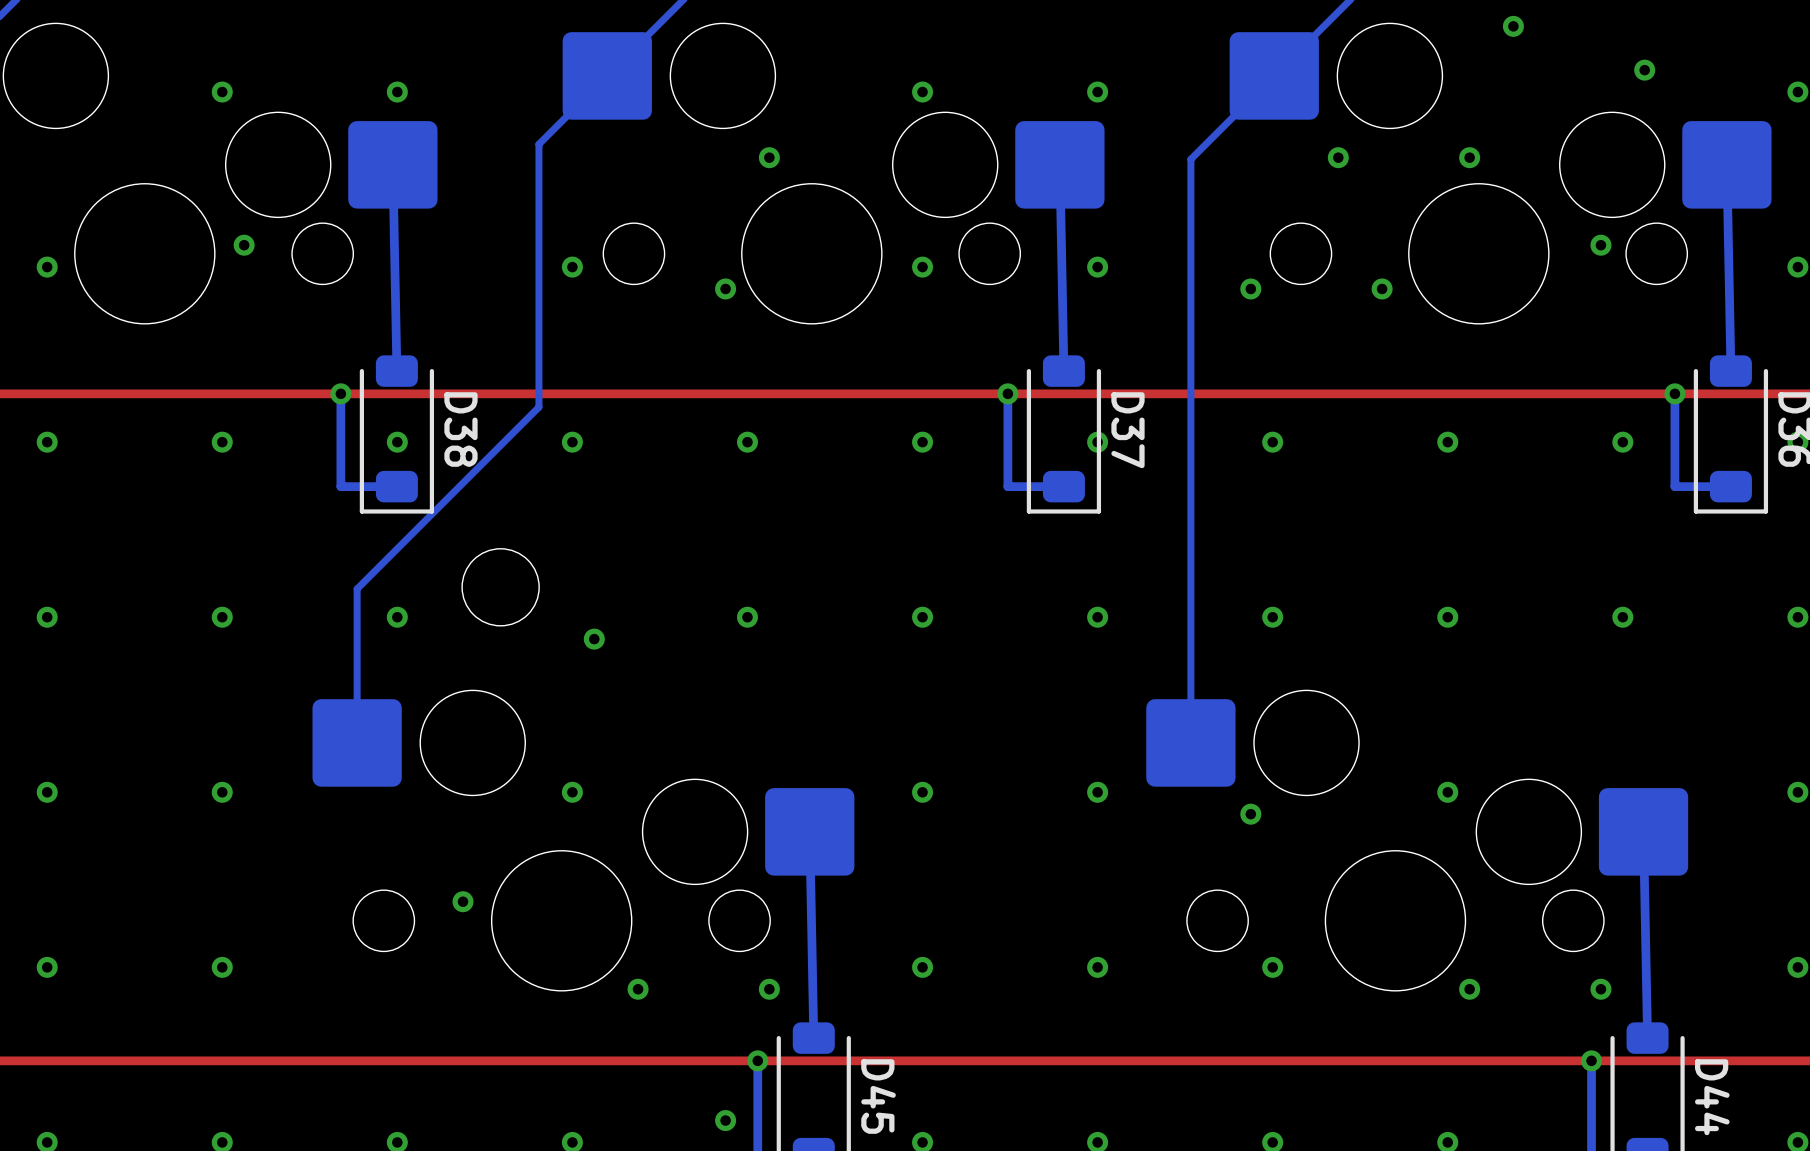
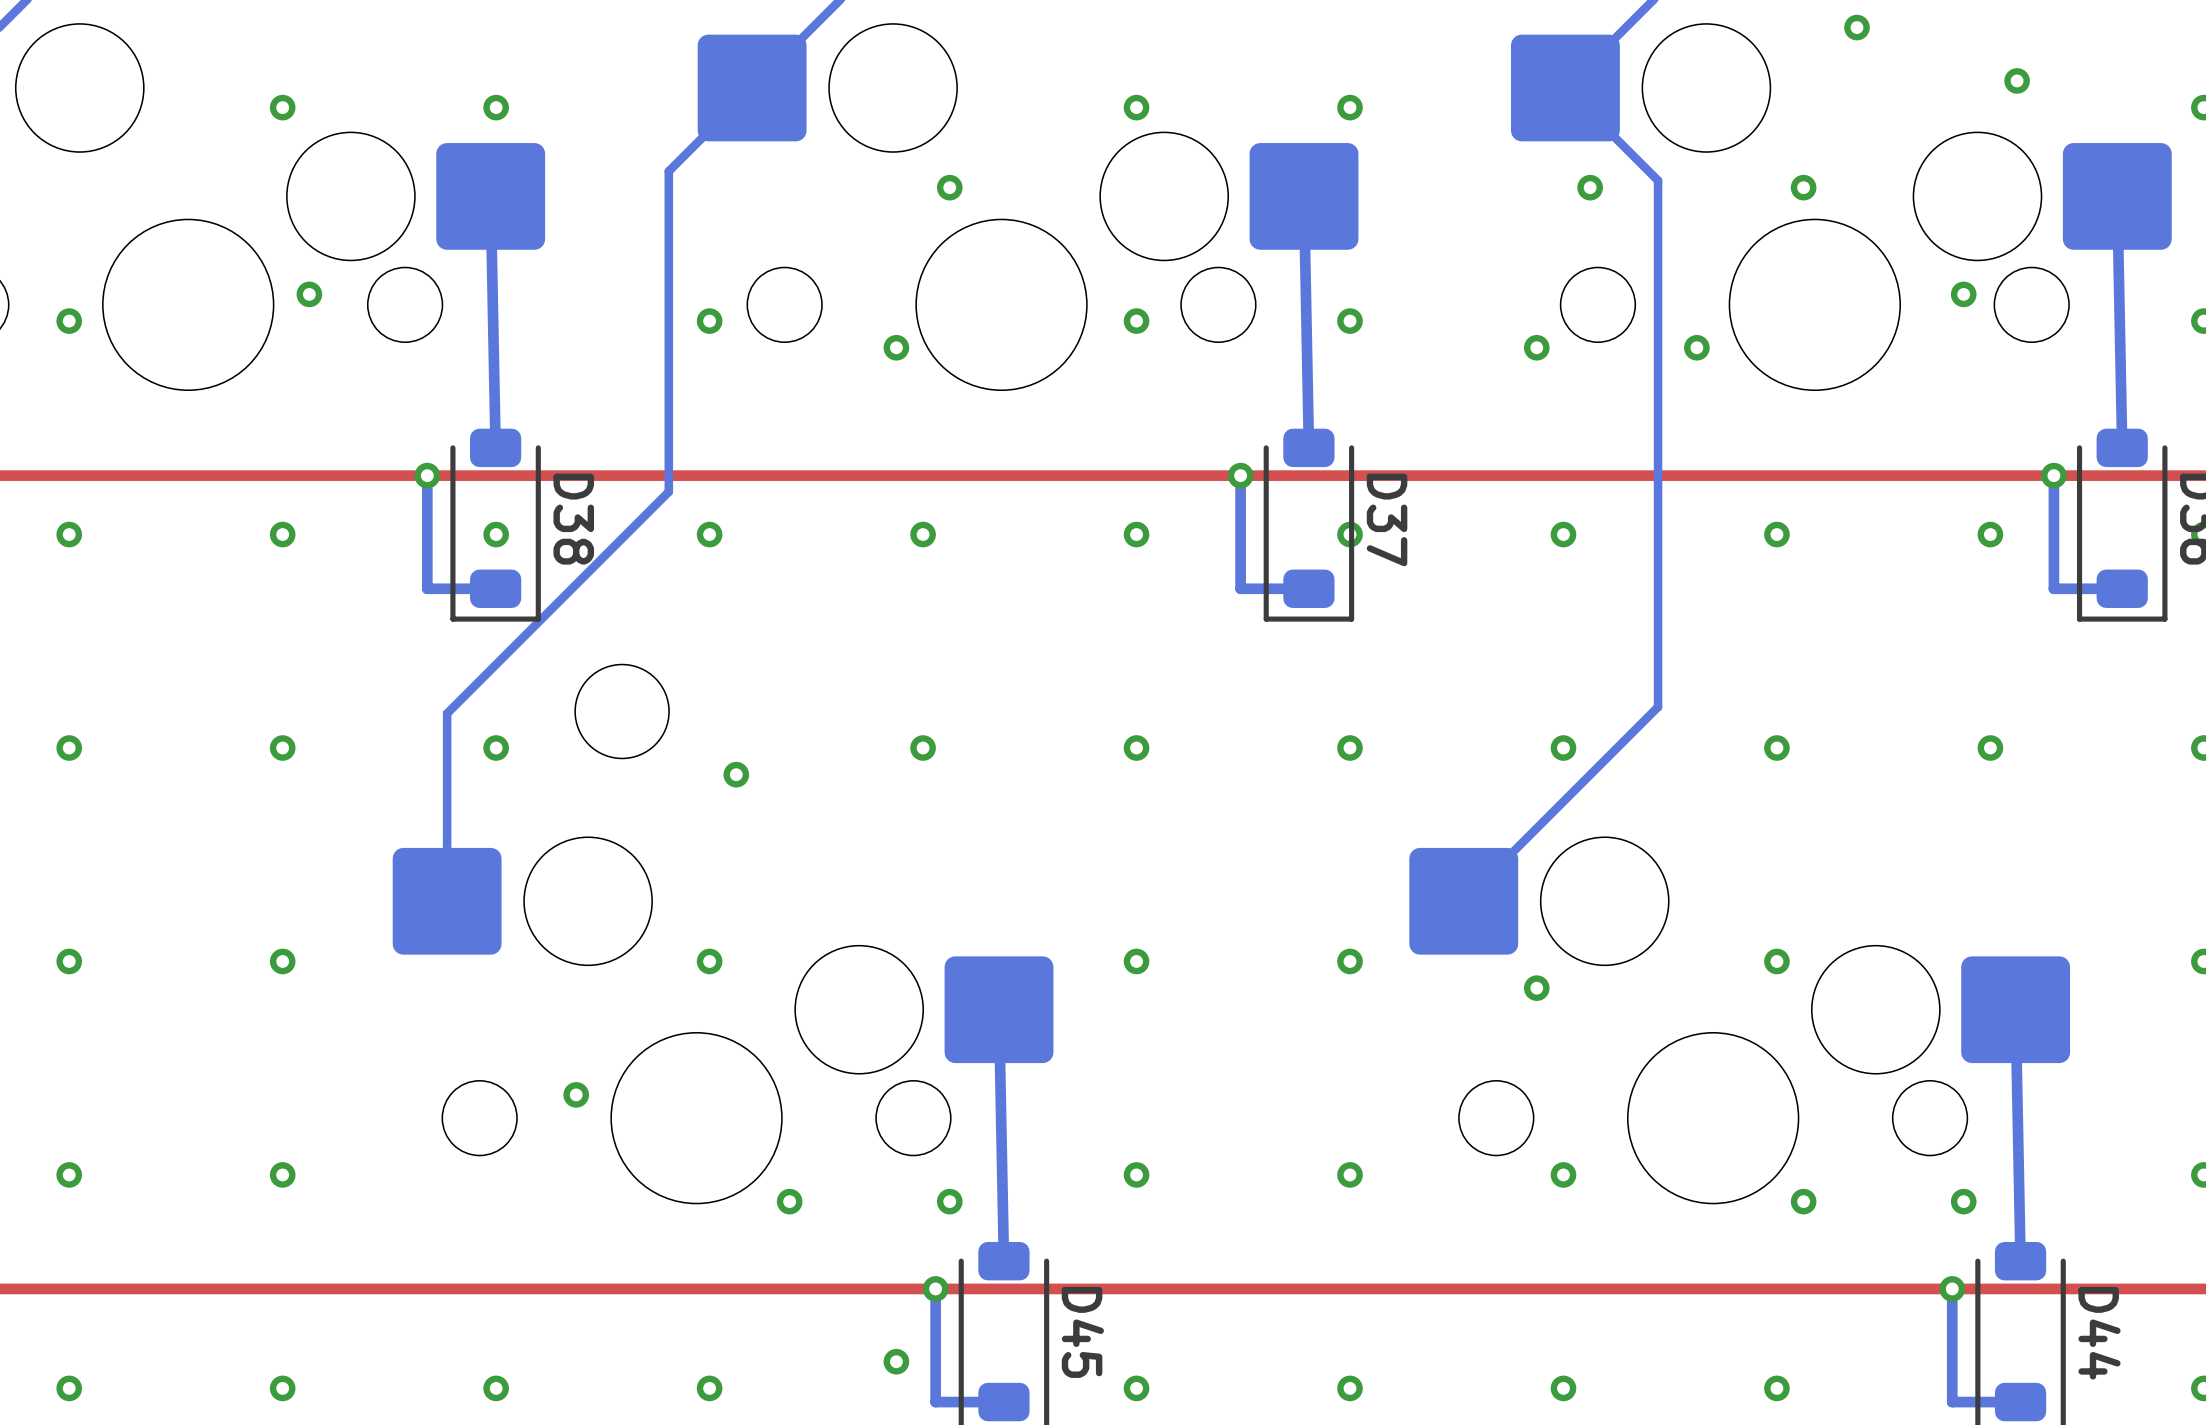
bottom track: (1274, 75) (1190, 159) (1190, 742) -> (1565, 87) (1658, 180) (1658, 706) (1463, 901)
via position: (1338, 157) -> (1590, 187)

